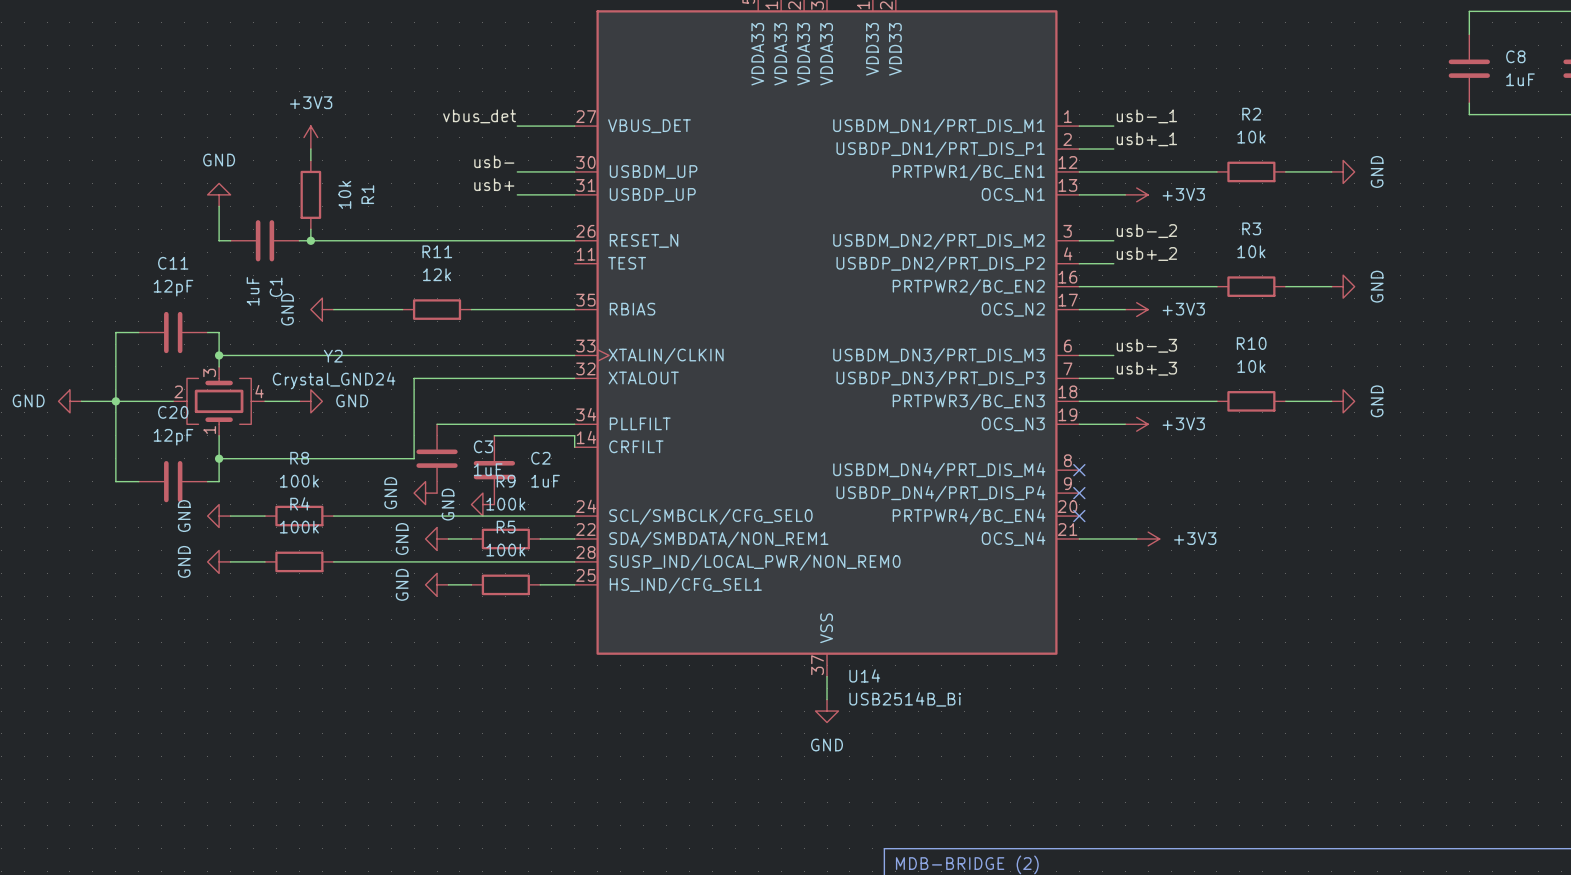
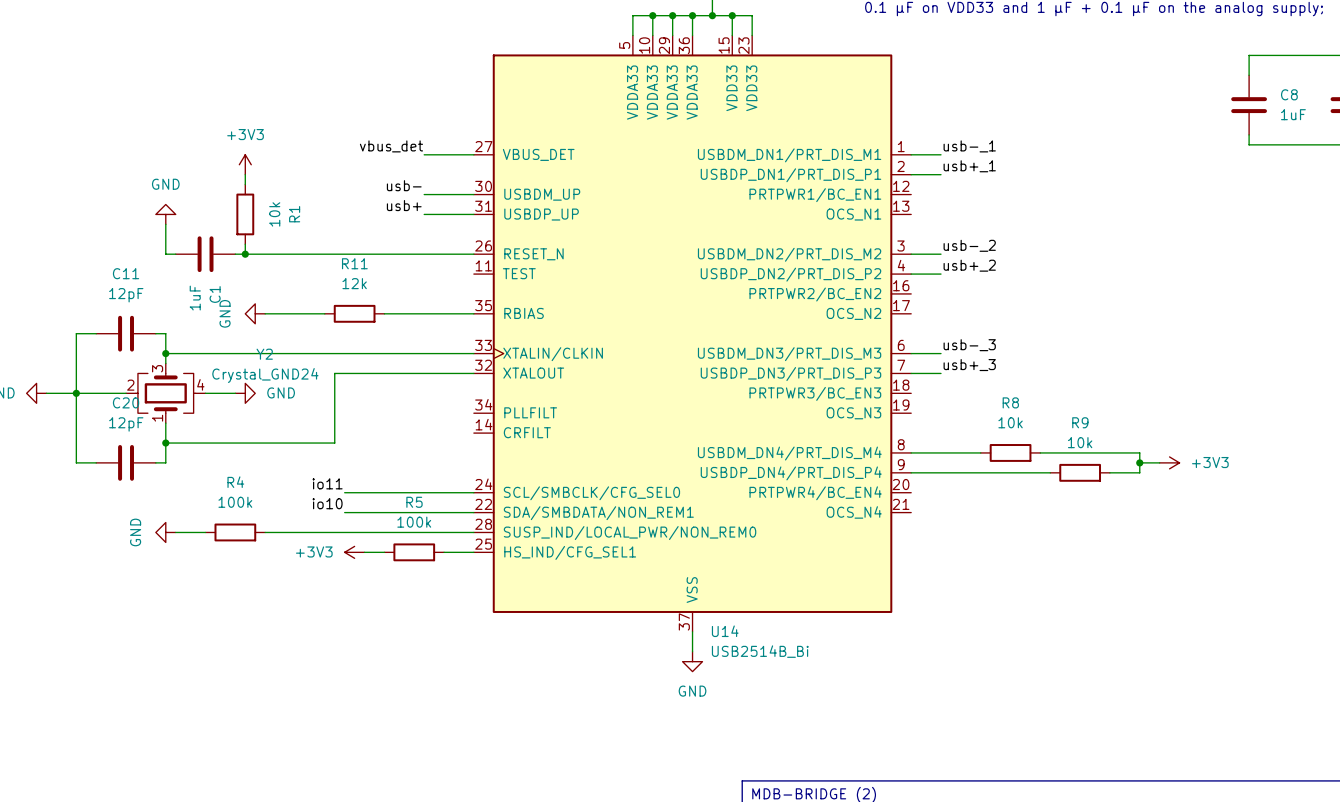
wire: (1079, 171) (1216, 171) -> none
R2: 10k (1251, 171) -> none
wire: (1285, 171) (1331, 171) -> none
power symbol: GND (1343, 171) -> none
wire: (1079, 194) (1125, 194) -> none
power symbol: +3V3 (1136, 194) -> none
wire: (1079, 286) (1216, 286) -> none
R3: 10k (1251, 286) -> none
wire: (1285, 286) (1331, 286) -> none
power symbol: GND (1343, 286) -> none
wire: (1079, 309) (1125, 309) -> none
power symbol: +3V3 (1136, 309) -> none
wire: (1079, 401) (1216, 401) -> none
R10: 10k (1251, 401) -> none
wire: (1285, 401) (1331, 401) -> none
power symbol: GND (1343, 401) -> none
wire: (437, 424) (574, 424) -> none
wire: (1079, 424) (1125, 424) -> none
power symbol: +3V3 (1136, 424) -> none
wire: (494, 435) (574, 435) (574, 447) -> none
C3: 1uF (437, 458) -> none
C2: 1uF (494, 470) -> none
wire: none -> (911, 452) (980, 452)
no-connect mark: (1079, 470) -> none
wire: none -> (1040, 452) (1139, 452) (1139, 472) (1109, 472)
R8 value: 100k (299, 481) -> 10k (1010, 422)
wire: none -> (1139, 462) (1159, 462)
junction: none -> (1139, 462)
power symbol: none -> +3V3 (1169, 462)
power symbol: GND (425, 493) -> none
wire: none -> (911, 472) (1050, 472)
no-connect mark: (1079, 493) -> none
power symbol: GND (482, 504) -> none
R9 value: 100k (505, 504) -> 10k (1080, 442)
label: none -> io11 (327, 483)
power symbol: GND (219, 516) -> none
wire: (230, 516) (264, 516) -> none
R8 position: (299, 516) -> (1010, 452)
wire: (333, 516) (425, 516) -> none
no-connect mark: (1079, 516) -> none
label: none -> io10 (327, 503)
power symbol: GND (437, 538) -> none
wire: none -> (384, 512) (444, 512)
R9 position: (505, 538) -> (1080, 472)
wire: (1079, 538) (1136, 538) -> none
power symbol: +3V3 (1148, 538) -> none
power symbol: GND (437, 584) -> +3V3 (354, 552)

